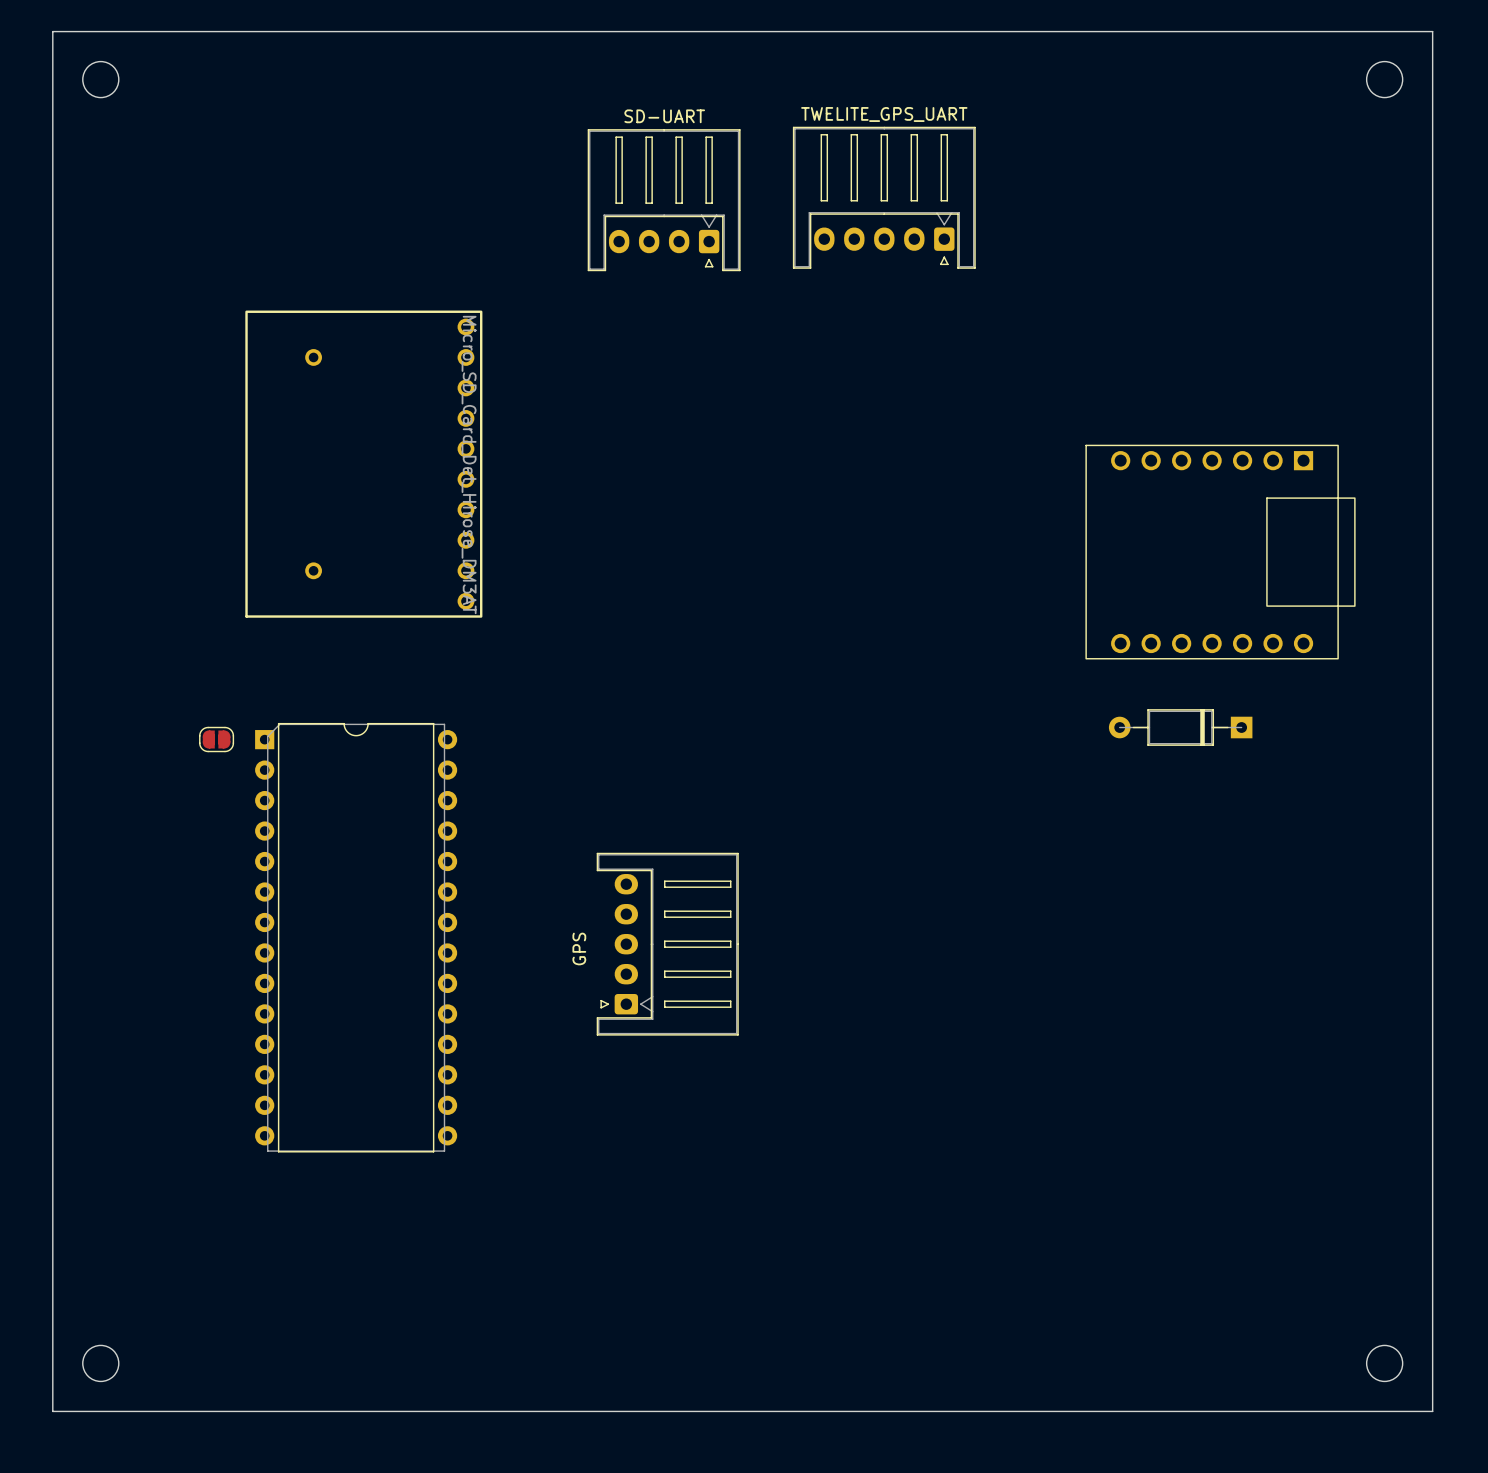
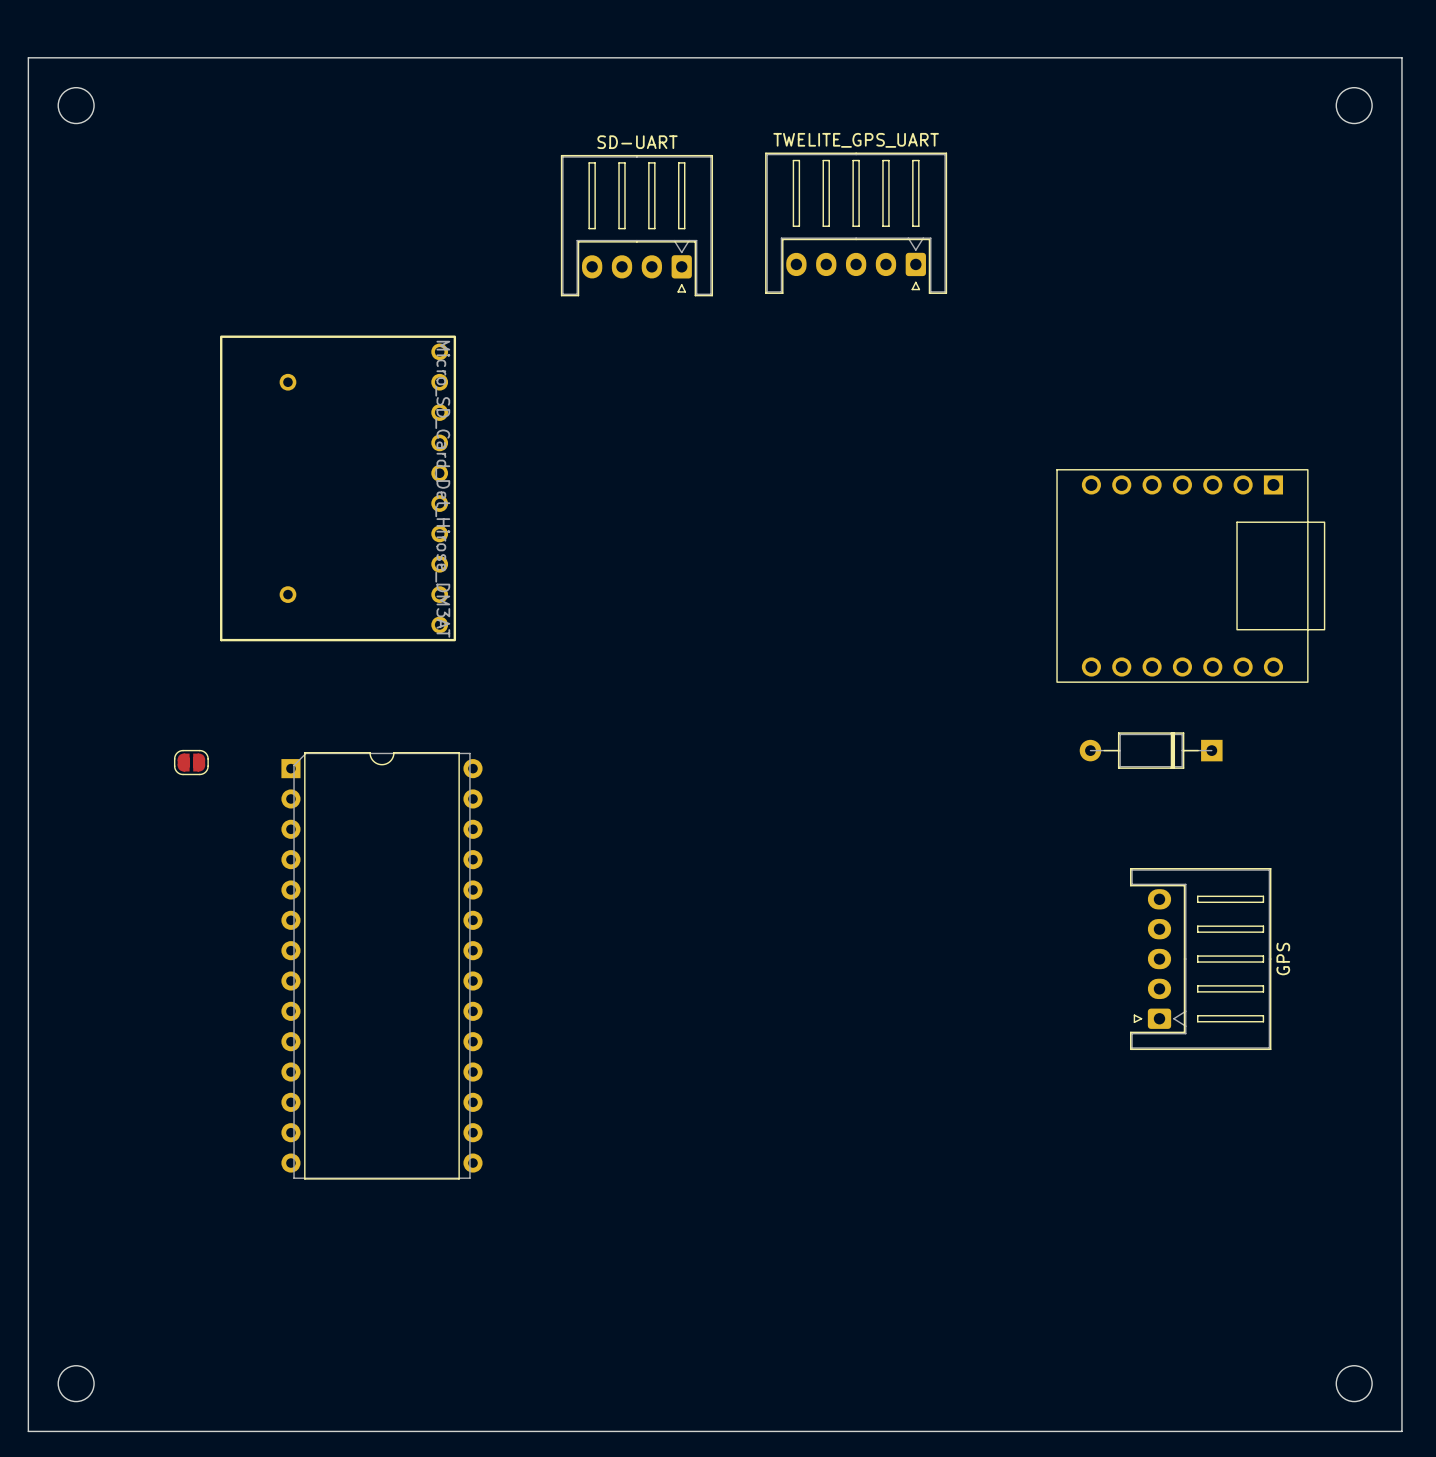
part: none -> GPS (1200, 959)
part position: (356, 937) -> (381, 965)
part: GPS (667, 944) -> none

